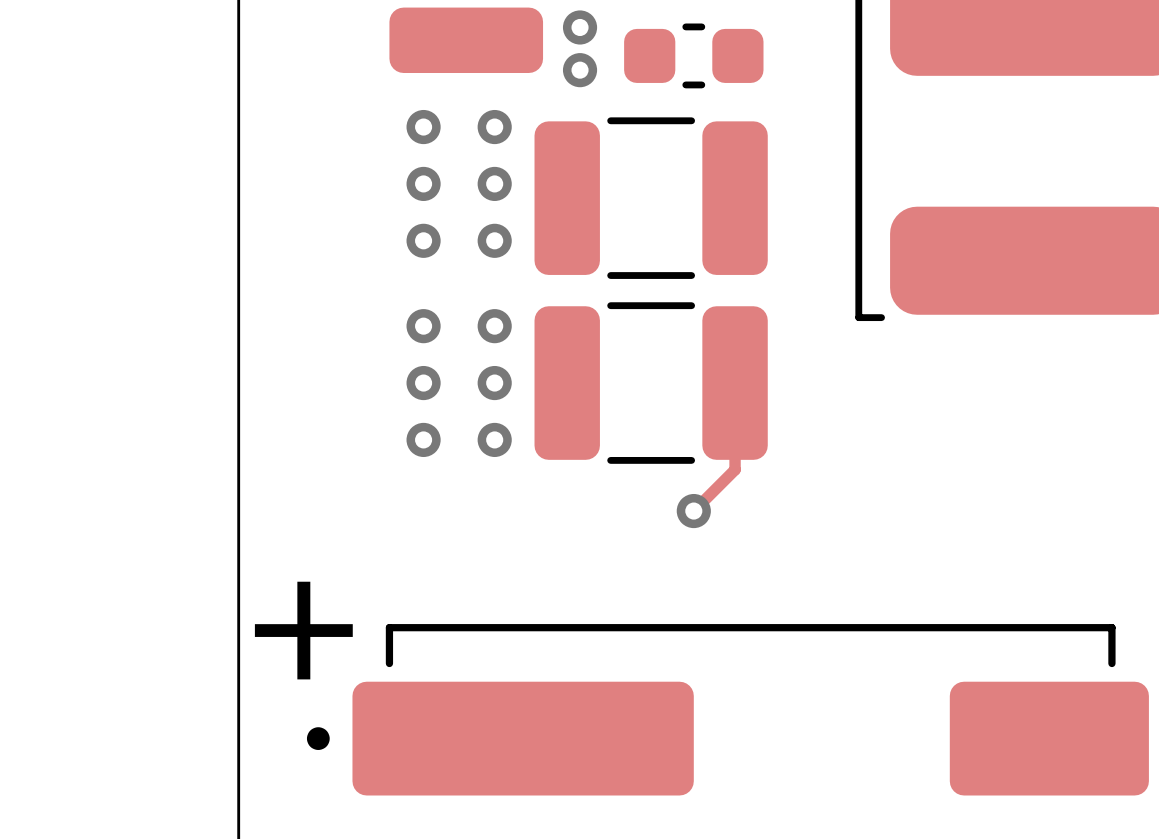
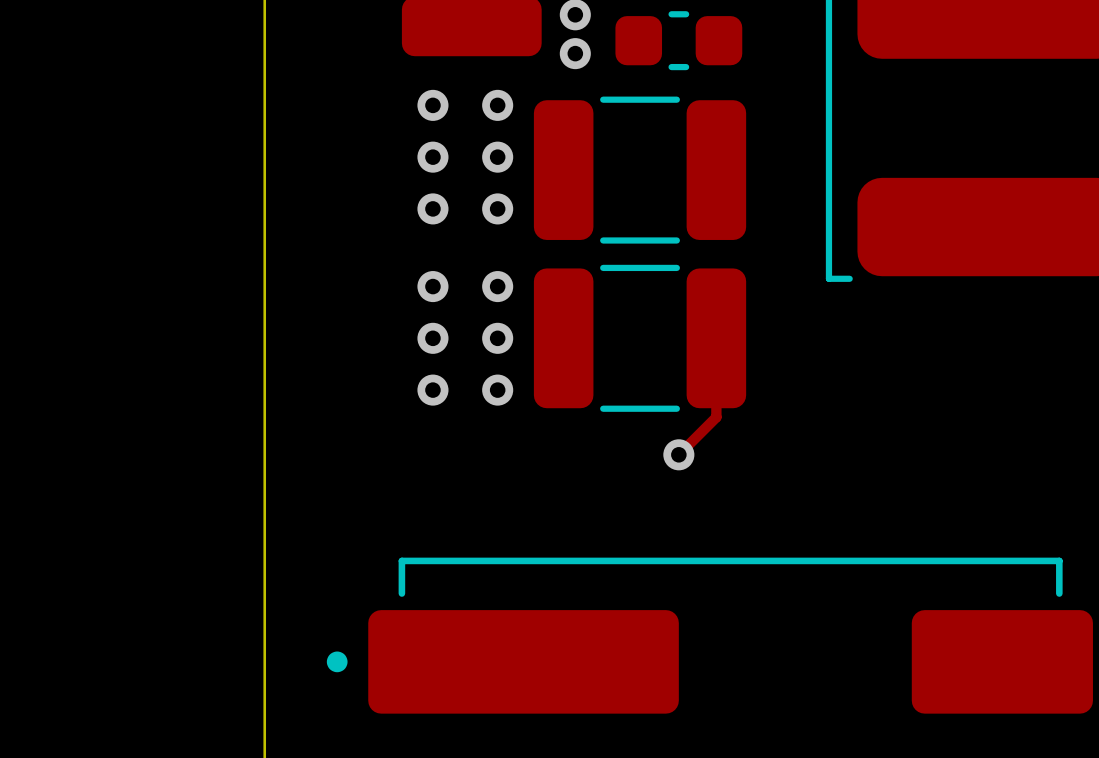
text: + (303, 630) -> none

